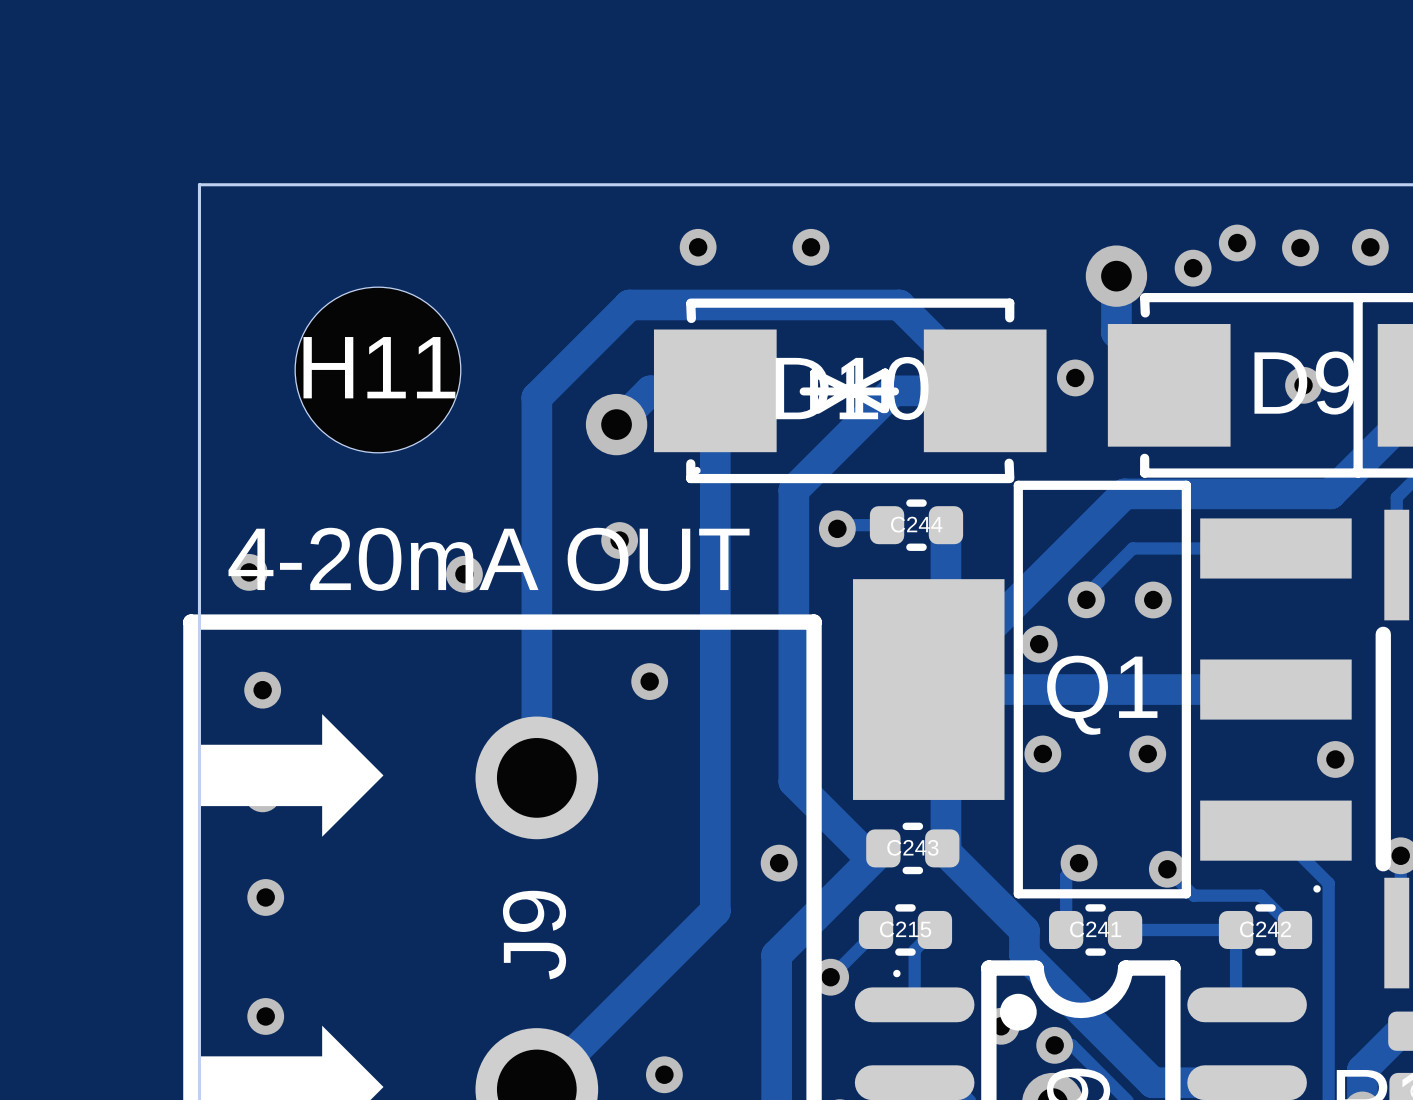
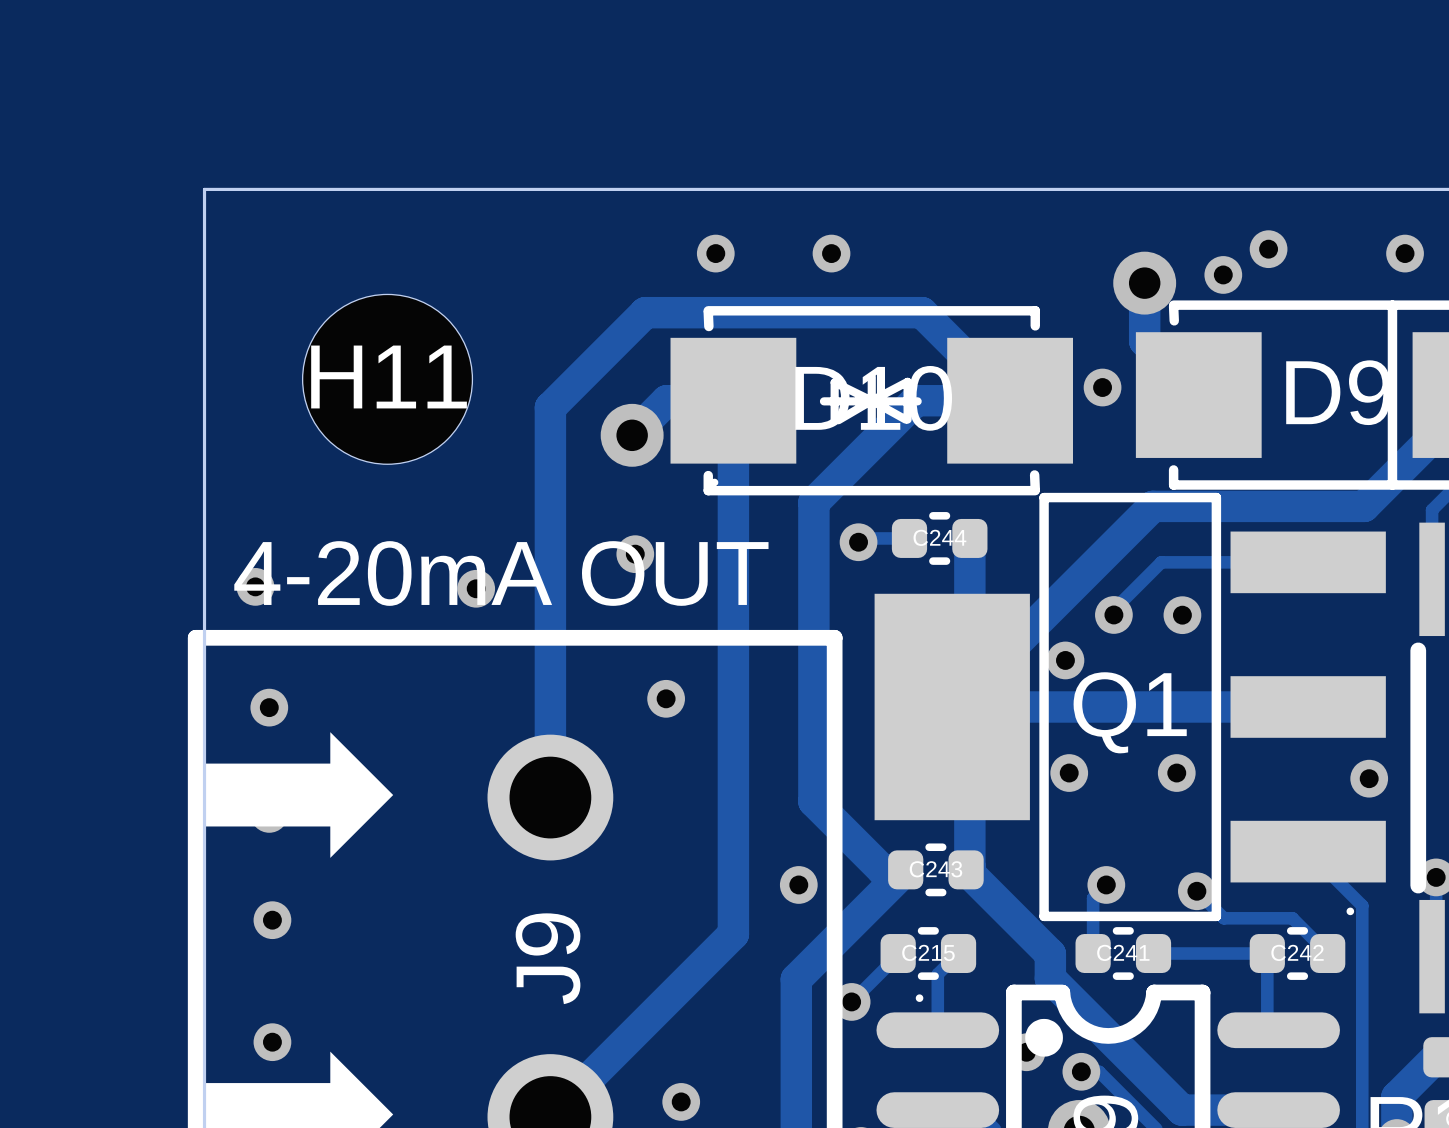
via: (1300, 247) -> none
via: (1303, 385) -> none

